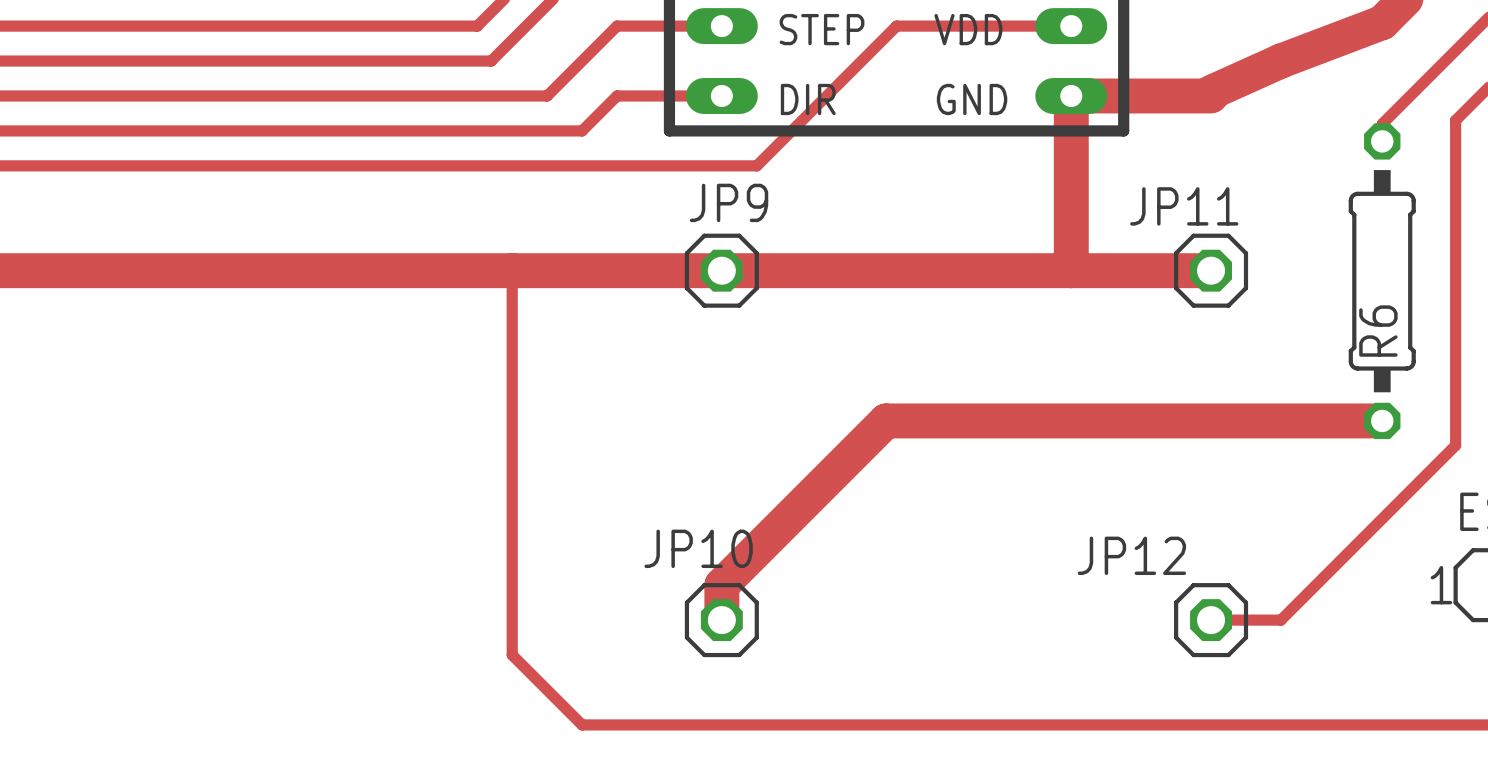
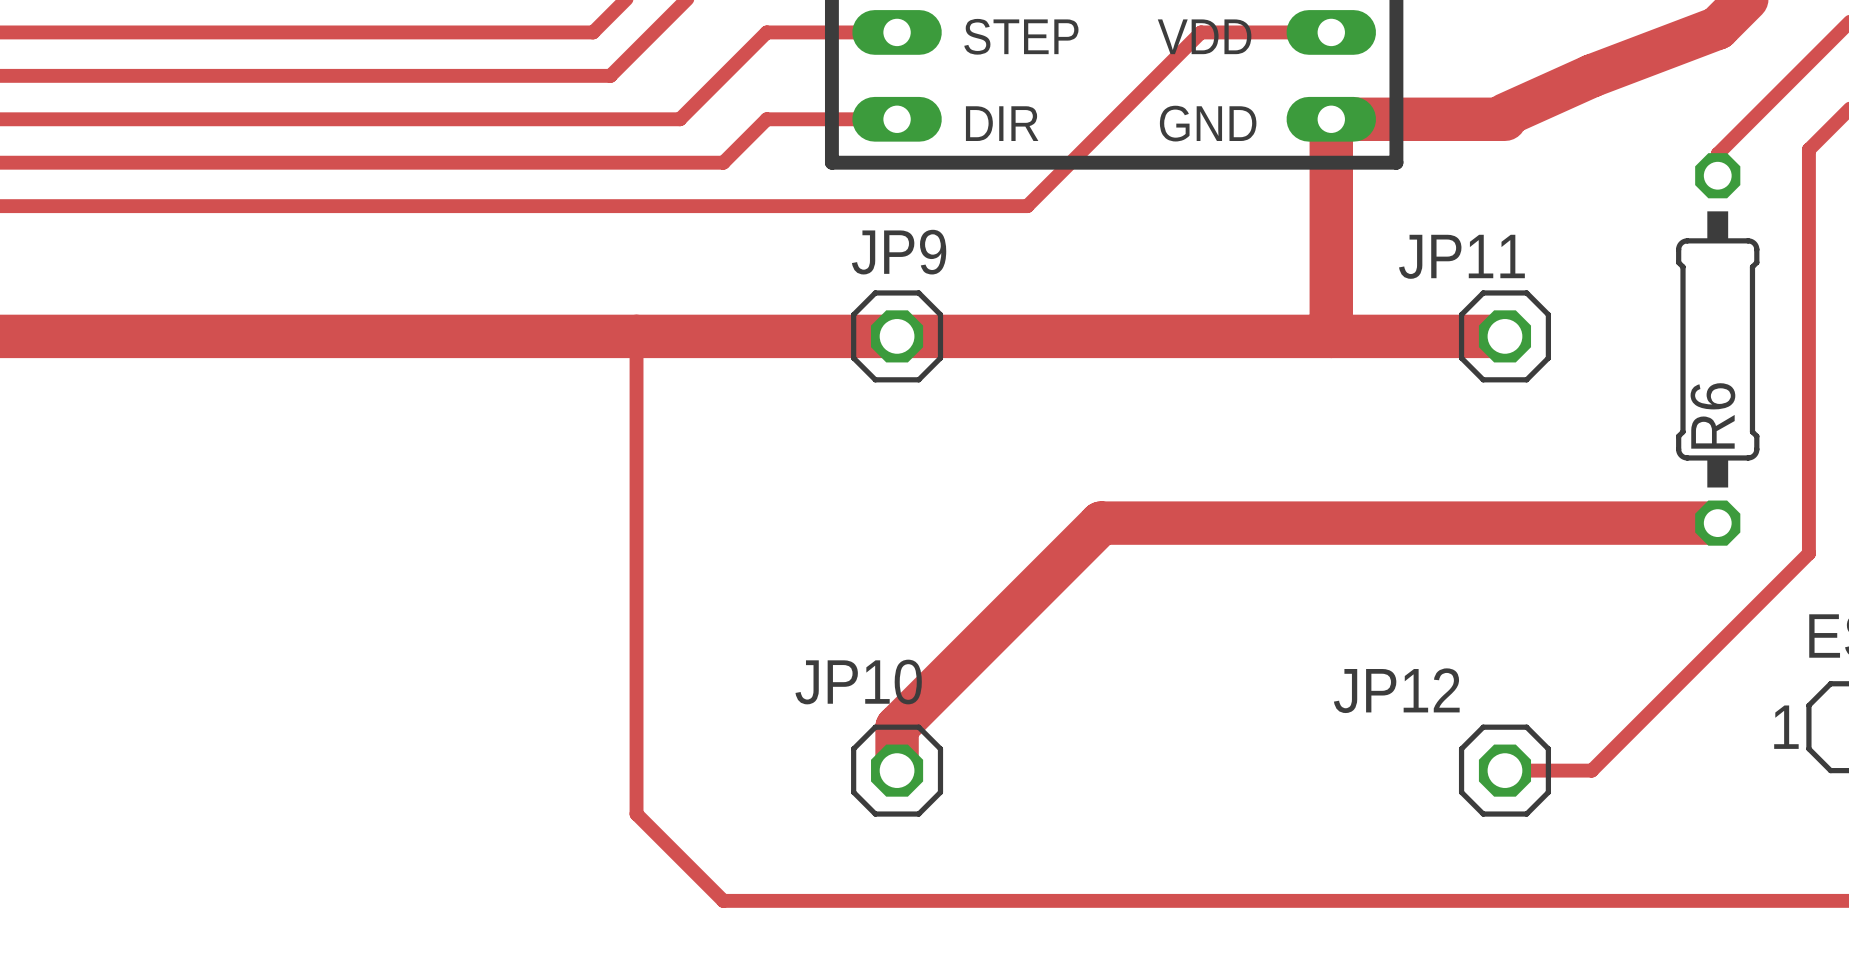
track: (966, 26) (896, 26) (756, 165) -> (1201, 32) (1027, 206) (940, 206)

